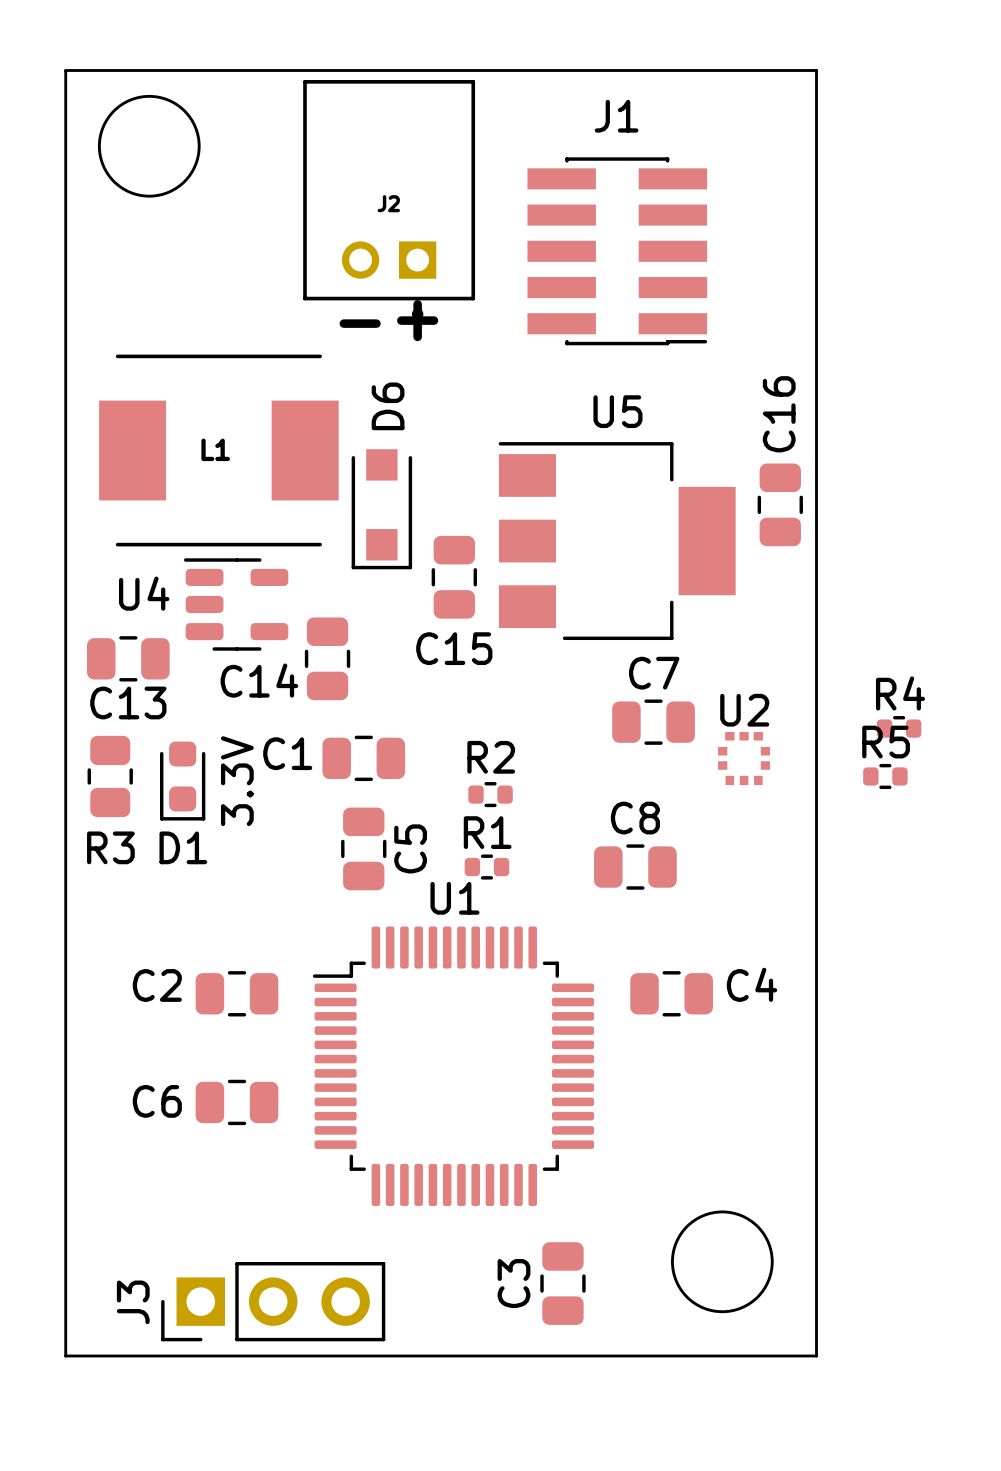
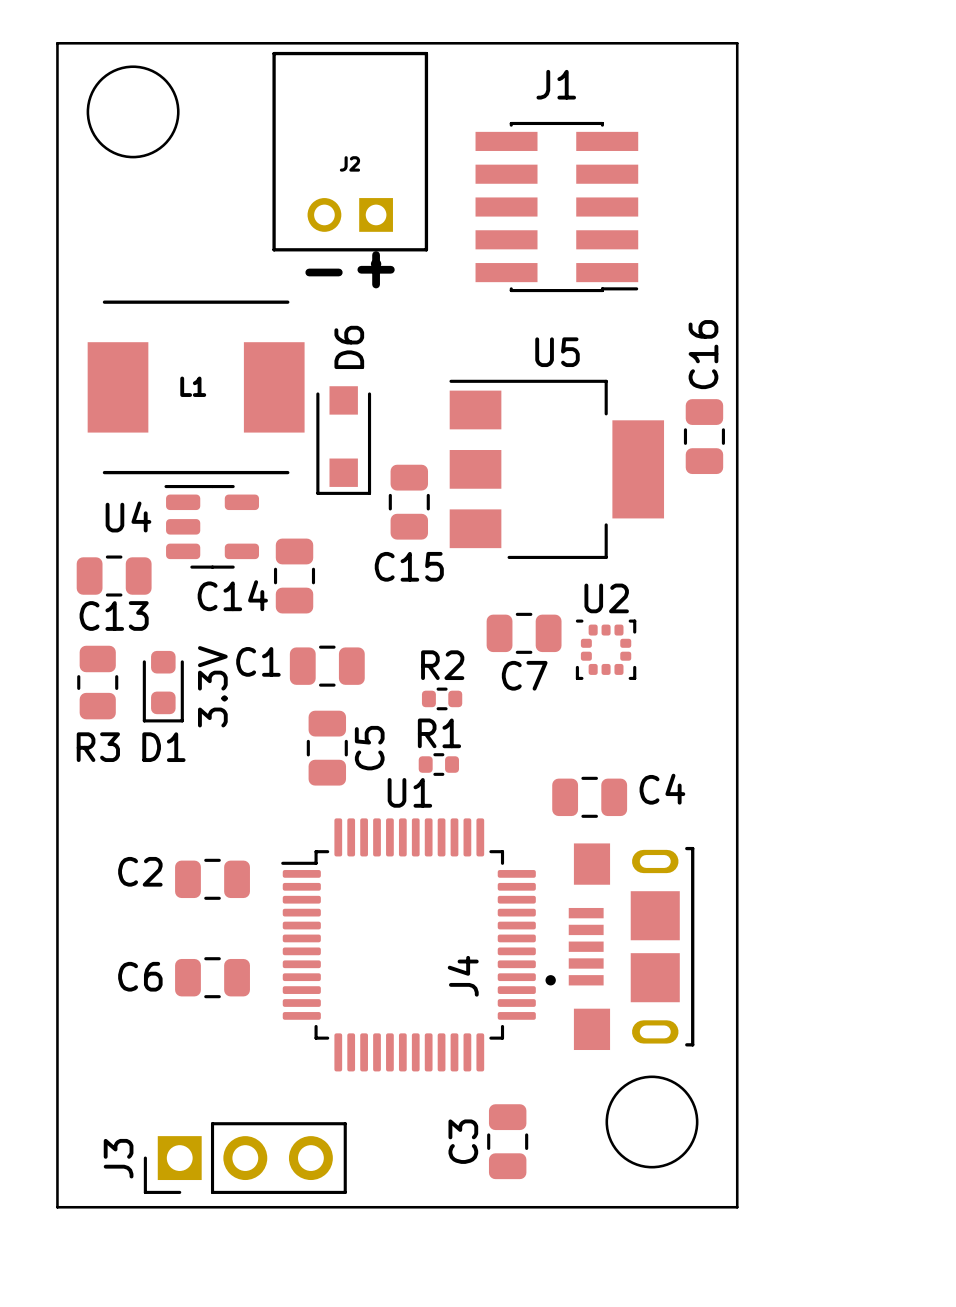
C7 name position: C7 (654, 673) -> C7 (524, 675)
C7 position: (653, 722) -> (524, 633)
R4: (899, 728) -> none
U2 footprint: [718, 731, 771, 786] -> [575, 619, 637, 680]
R5: (885, 776) -> none
C8: (635, 867) -> none
C4 position: (671, 993) -> (589, 797)
J4: none -> (619, 946)

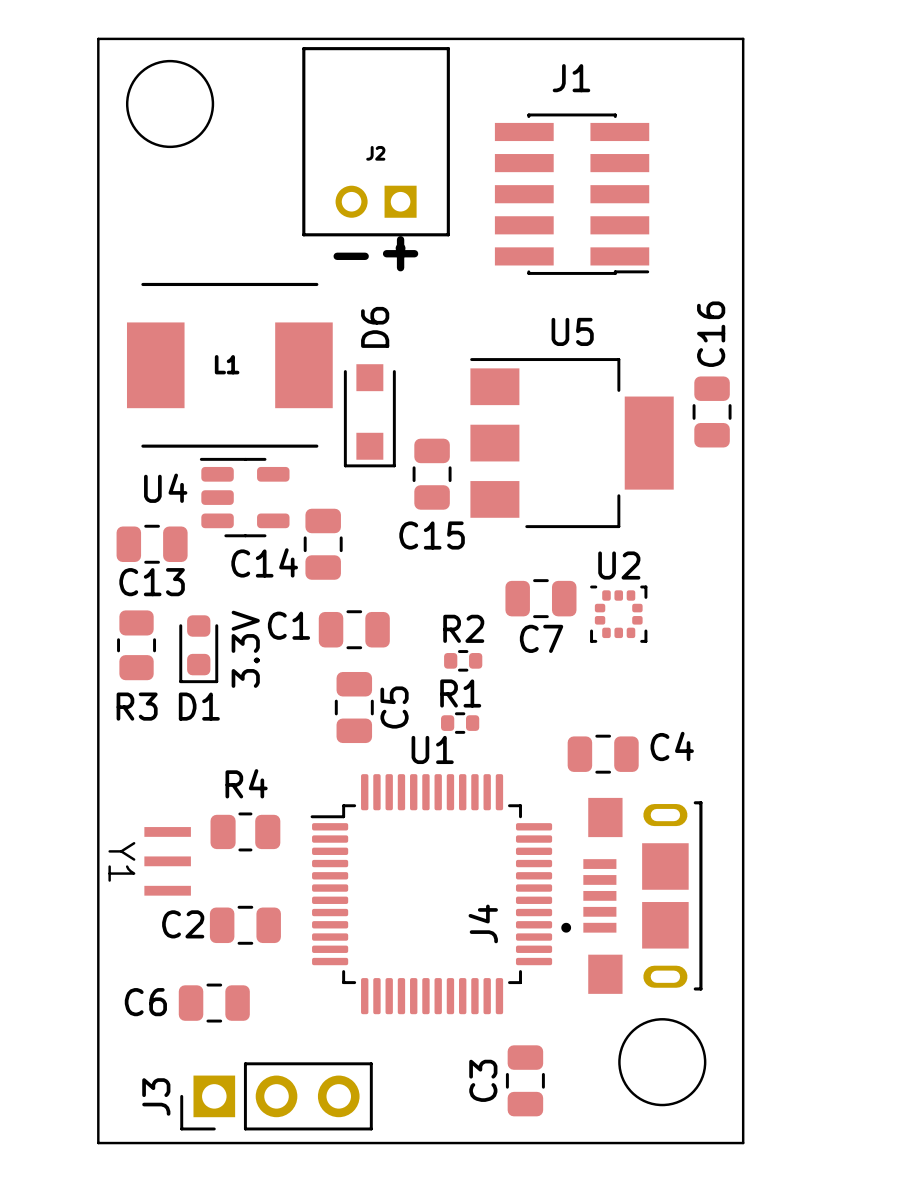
C2: (212, 879) -> none
R4: none -> (245, 831)
Y1: none -> (167, 861)
C6 name: C6 (140, 976) -> C2 (183, 924)
C6: none -> (214, 1003)

